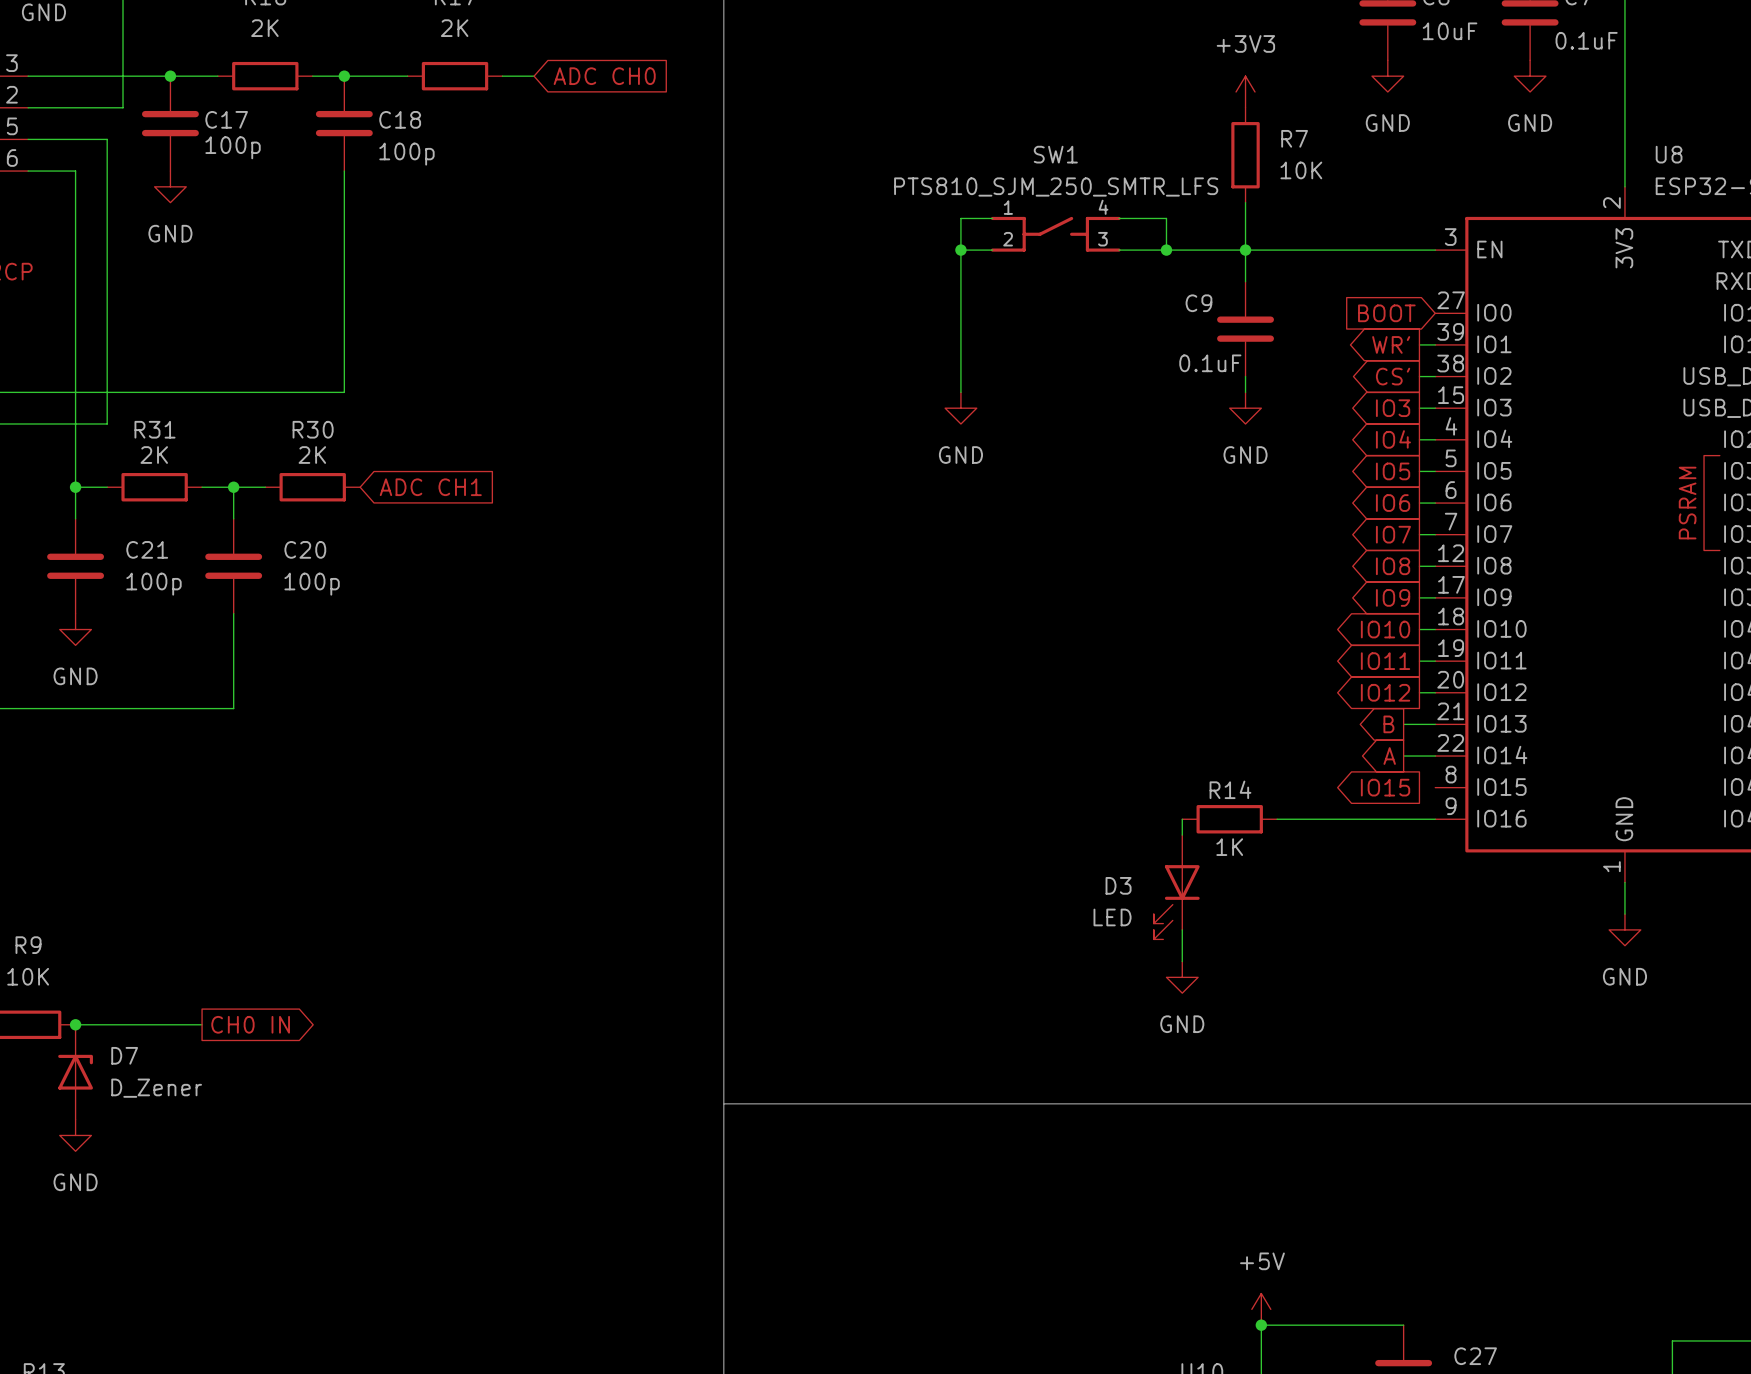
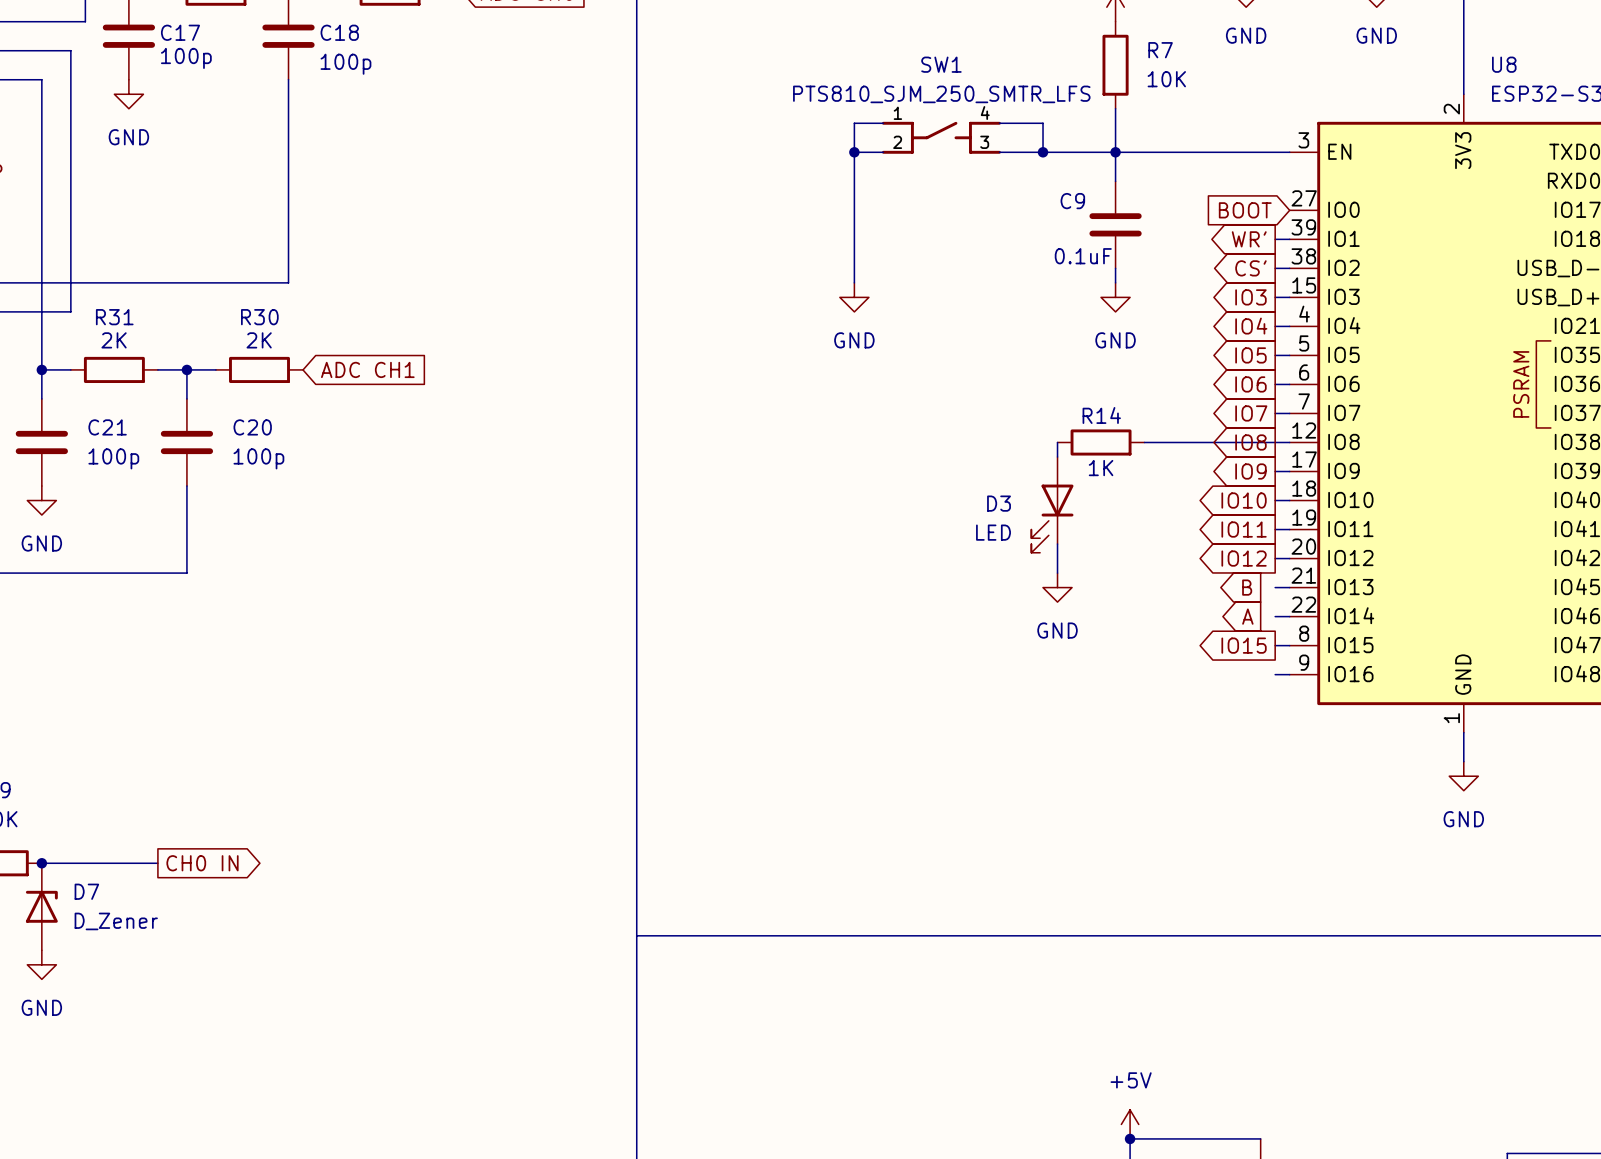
wire: (1403, 724) (1419, 724) -> none
wire: (1403, 756) (1419, 756) -> (1275, 645) (1289, 645)
wire: (1182, 819) (1182, 835) -> (1057, 442) (1057, 457)
R14 position: (1229, 819) -> (1101, 442)
wire: (1277, 819) (1419, 819) -> (1144, 442) (1275, 442)
D3 position: (1176, 887) -> (1052, 504)
wire: (1182, 929) (1182, 961) -> (1057, 544) (1057, 573)
power symbol position: GND (1182, 977) -> GND (1057, 587)

